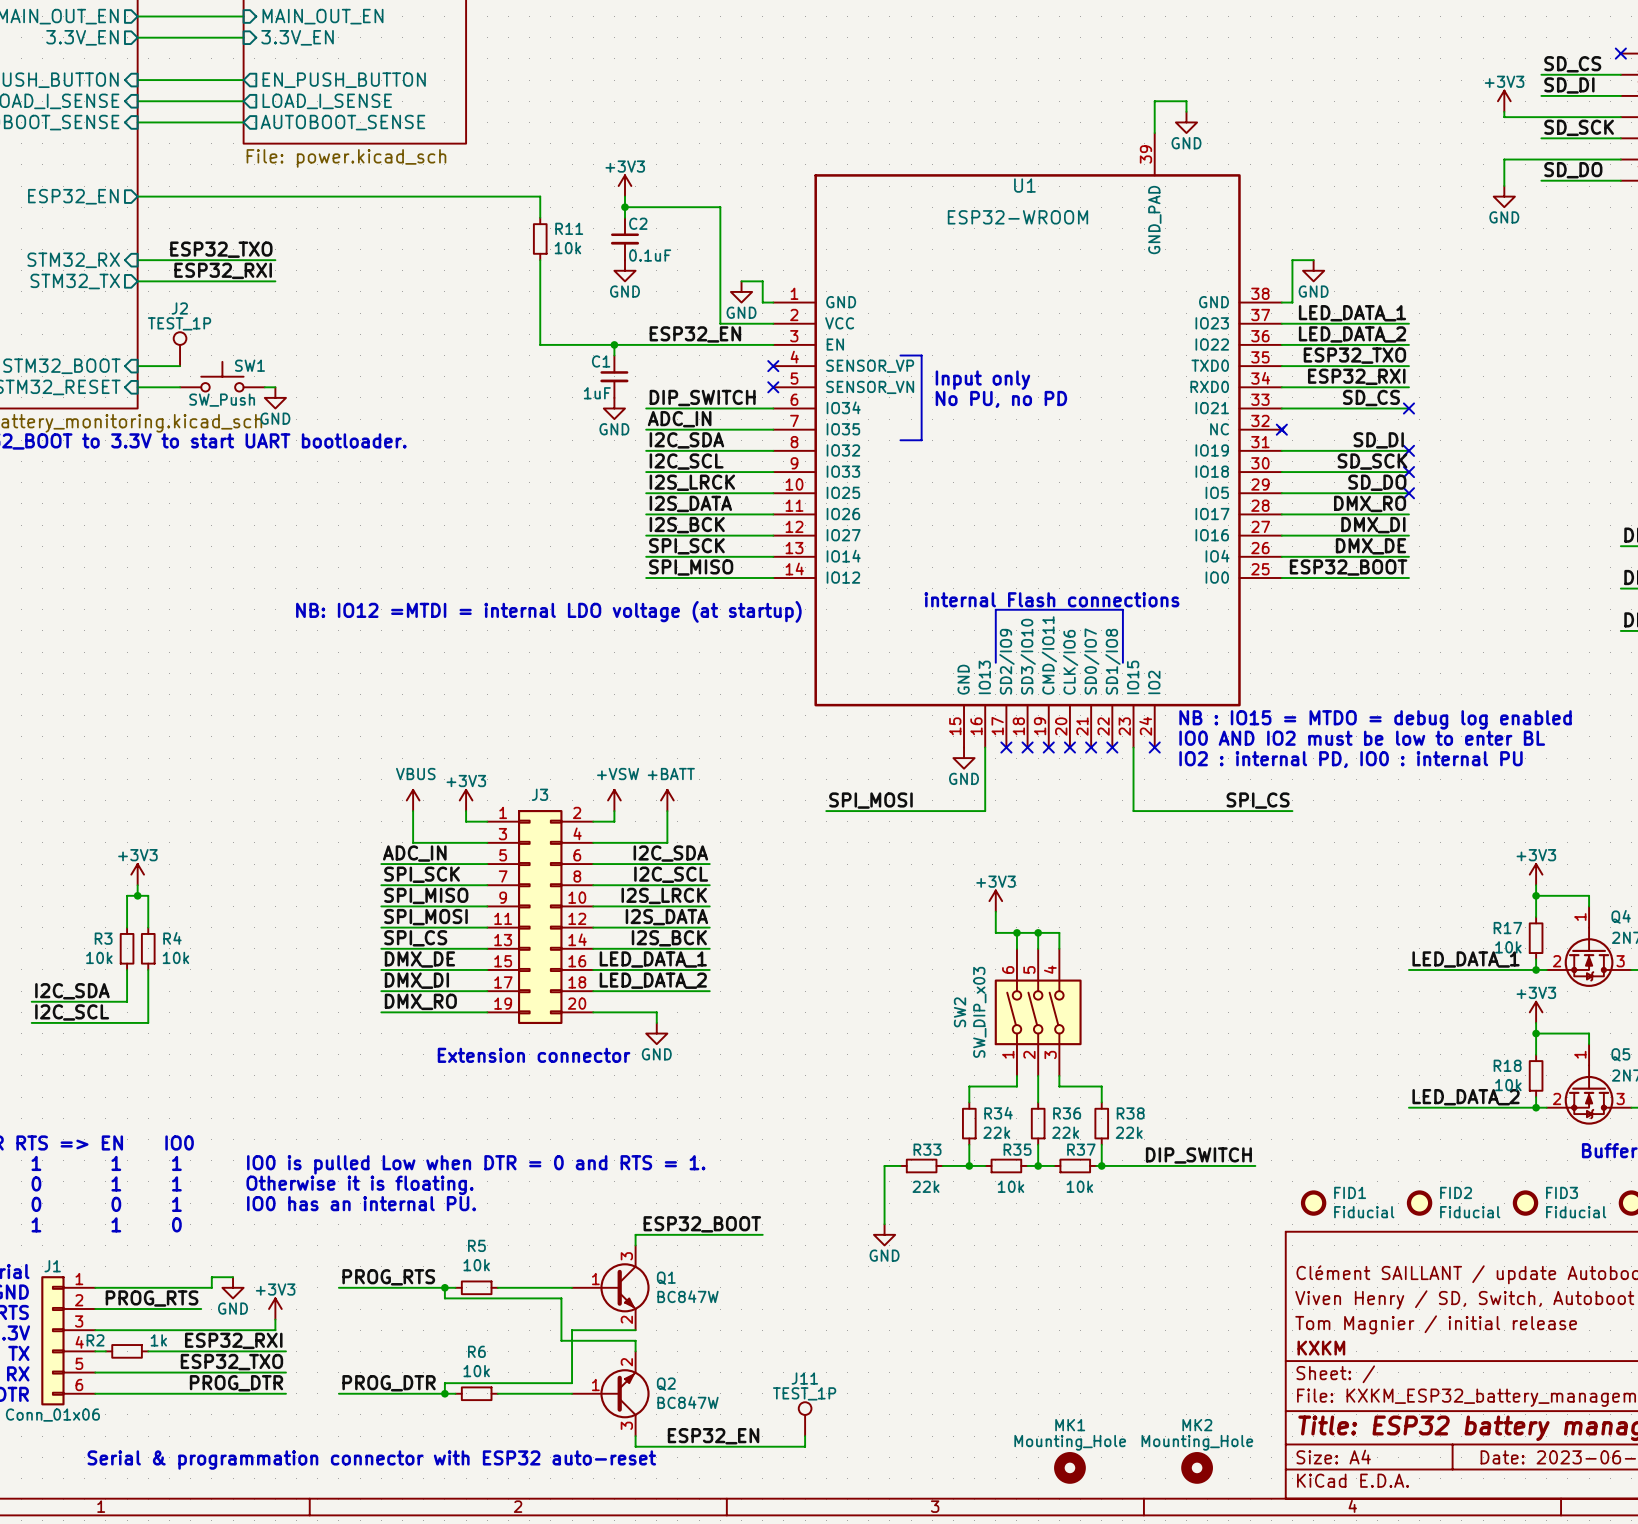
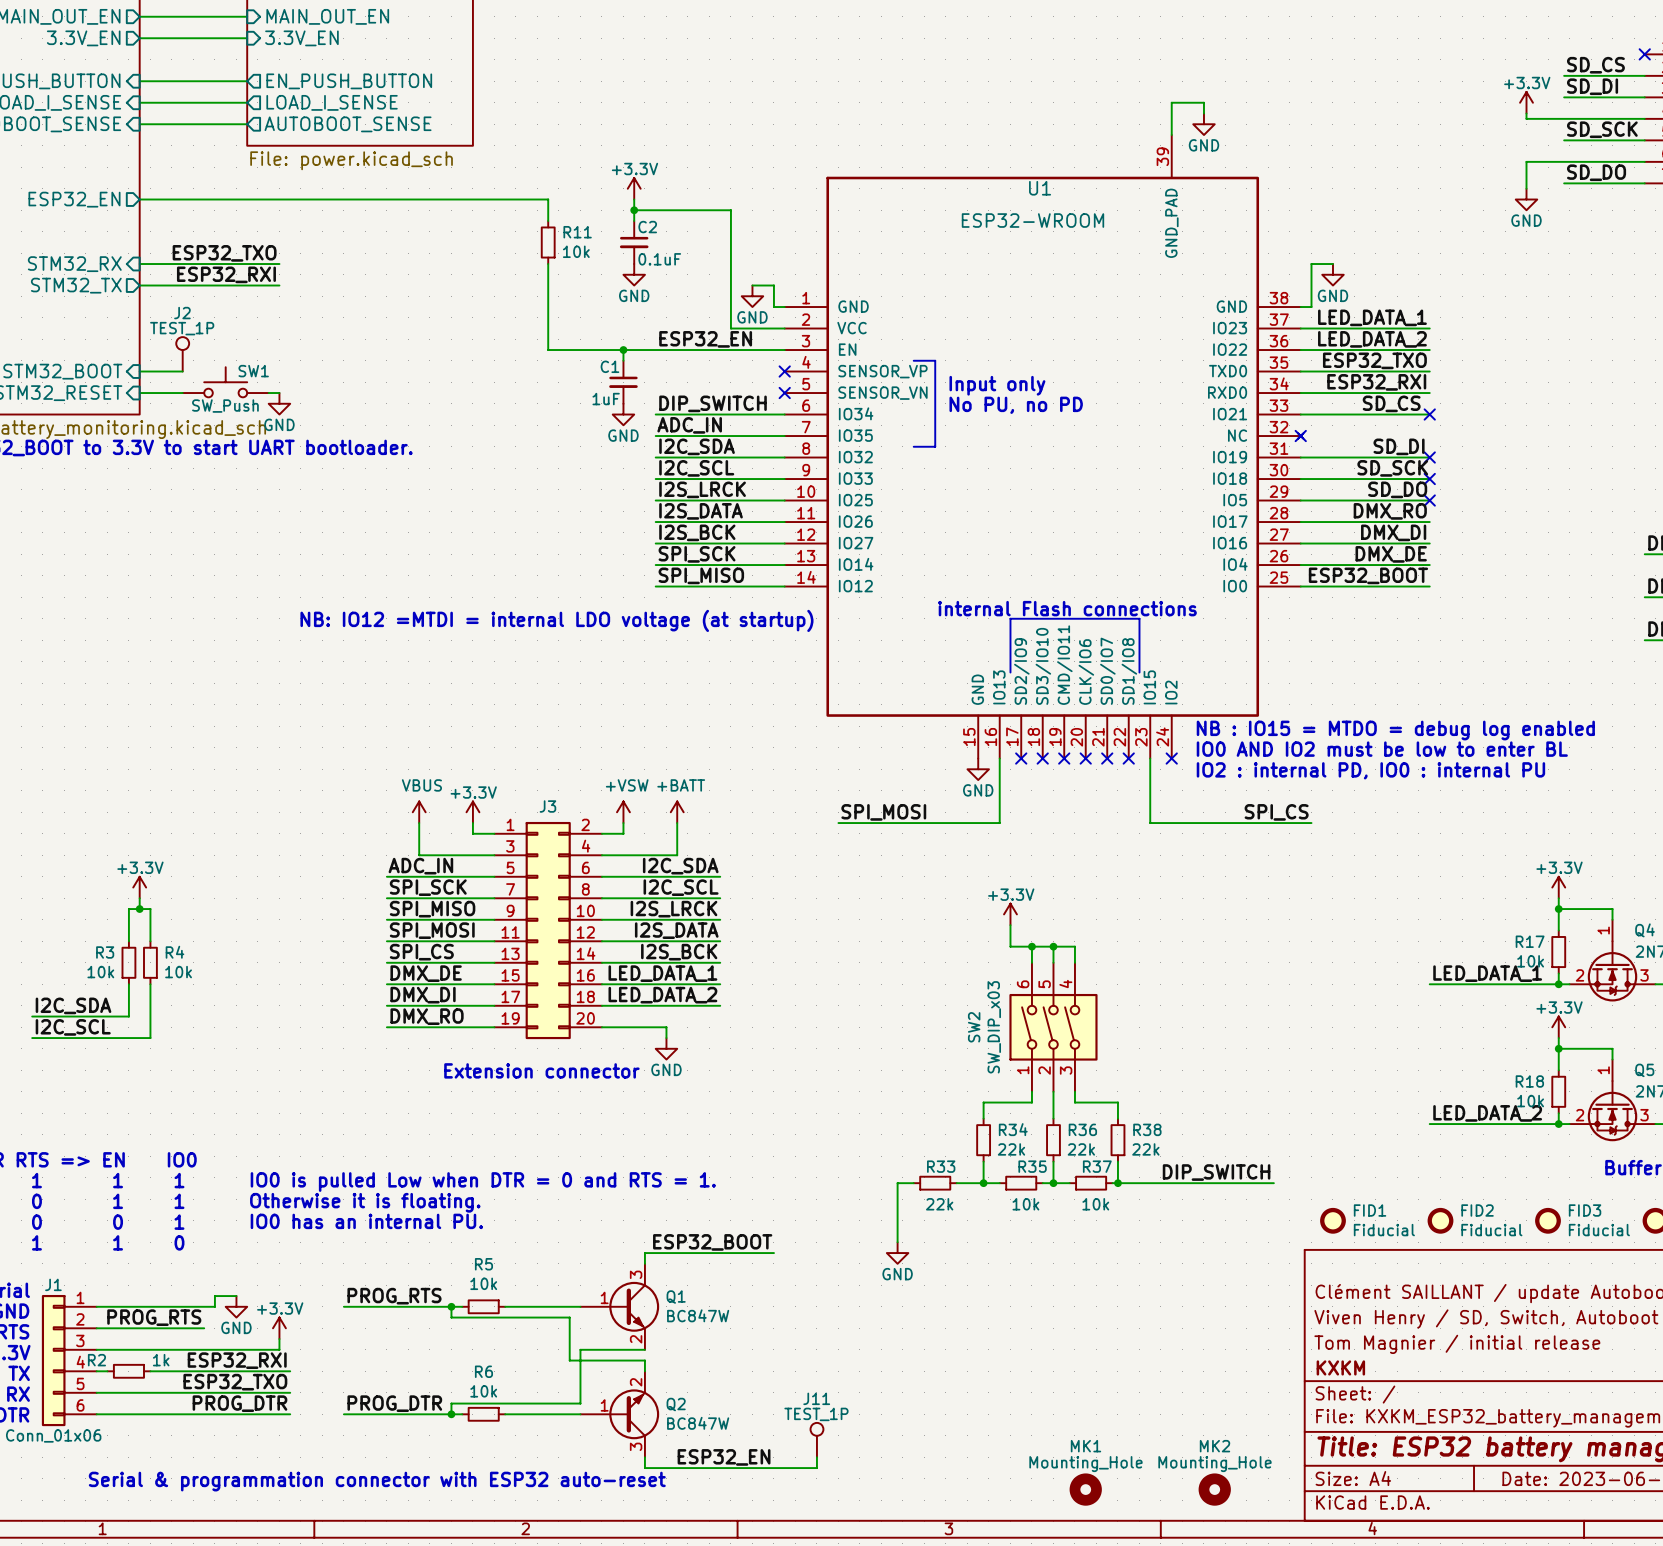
power symbol: +3V3 (1504, 101) -> +3.3V (1526, 102)
power symbol: +3V3 (624, 186) -> +3.3V (634, 188)
power symbol: +3V3 (466, 800) -> +3.3V (472, 812)
power symbol: +3V3 (137, 874) -> +3.3V (139, 887)
power symbol: +3V3 (1536, 874) -> +3.3V (1558, 887)
power symbol: +3V3 (995, 901) -> +3.3V (1010, 914)
power symbol: +3V3 (1536, 1012) -> +3.3V (1558, 1027)
power symbol: +3V3 (275, 1309) -> +3.3V (279, 1328)

